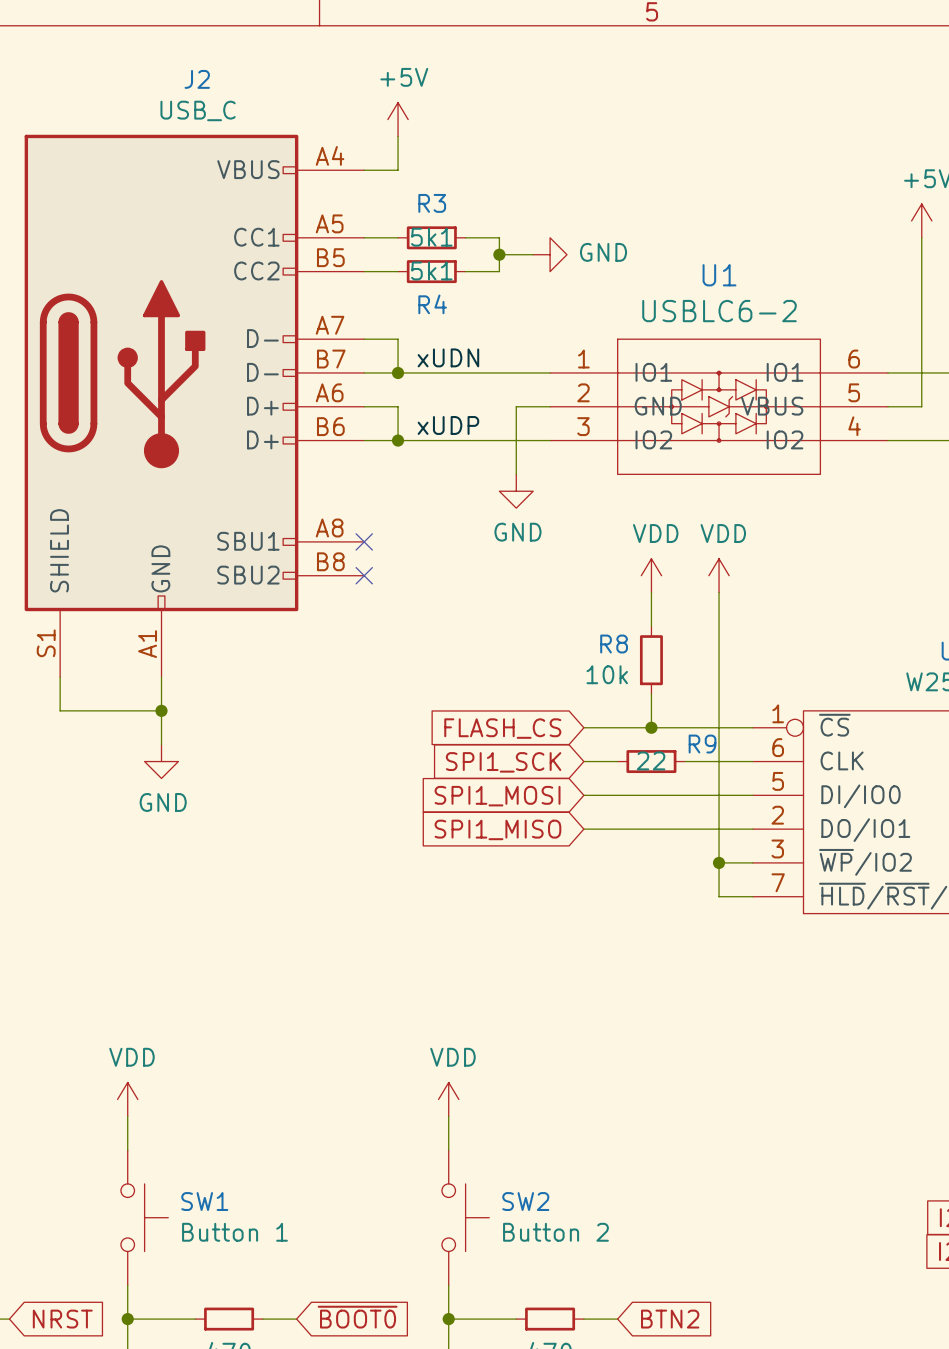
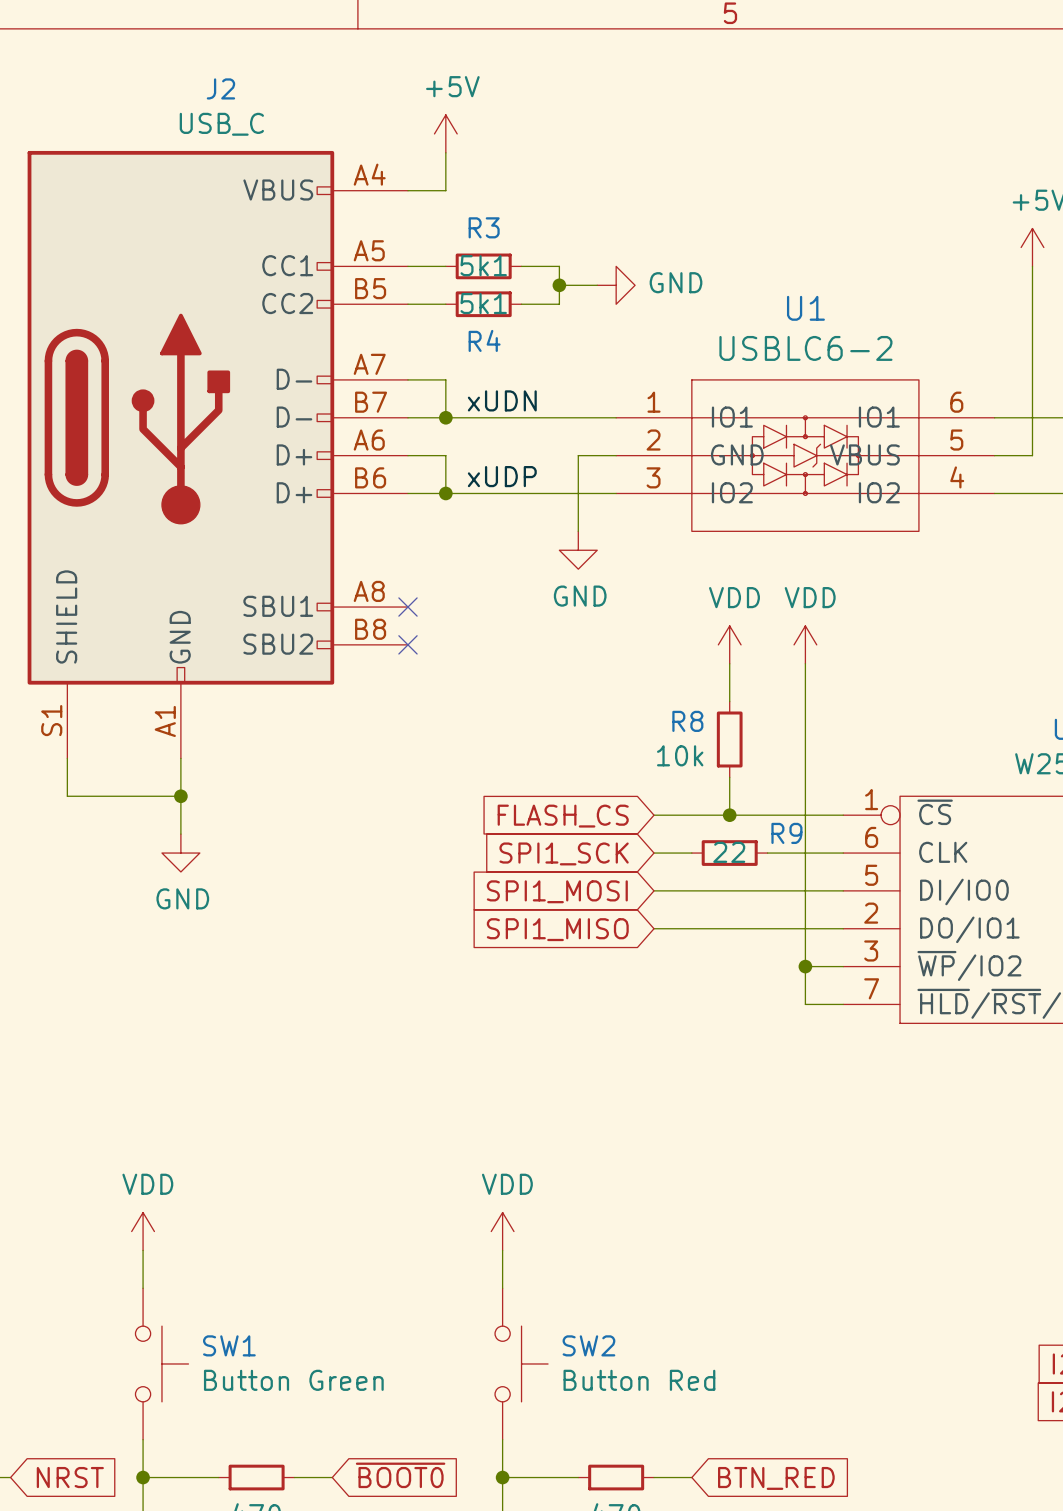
SW1 value: Button 1 (234, 1232) -> Button Green (293, 1380)
SW2 value: Button 2 (555, 1232) -> Button Red (639, 1380)
global label: BTN2 (670, 1319) -> BTN_RED (776, 1478)

